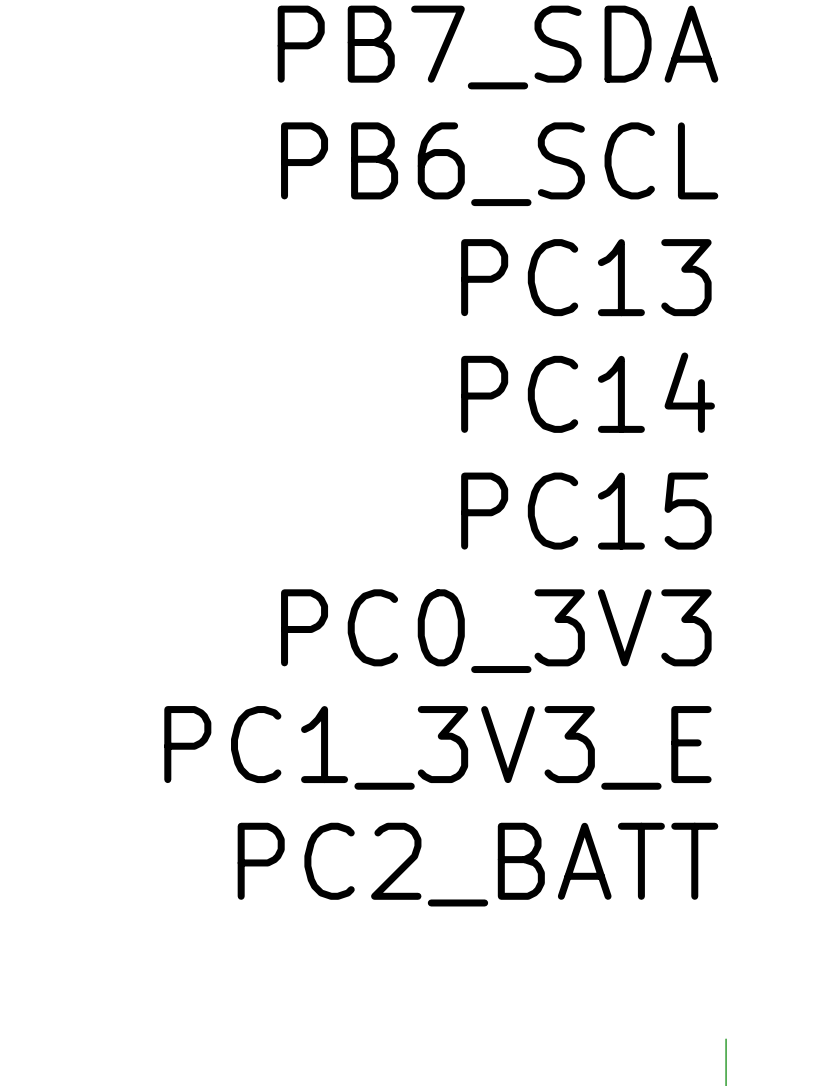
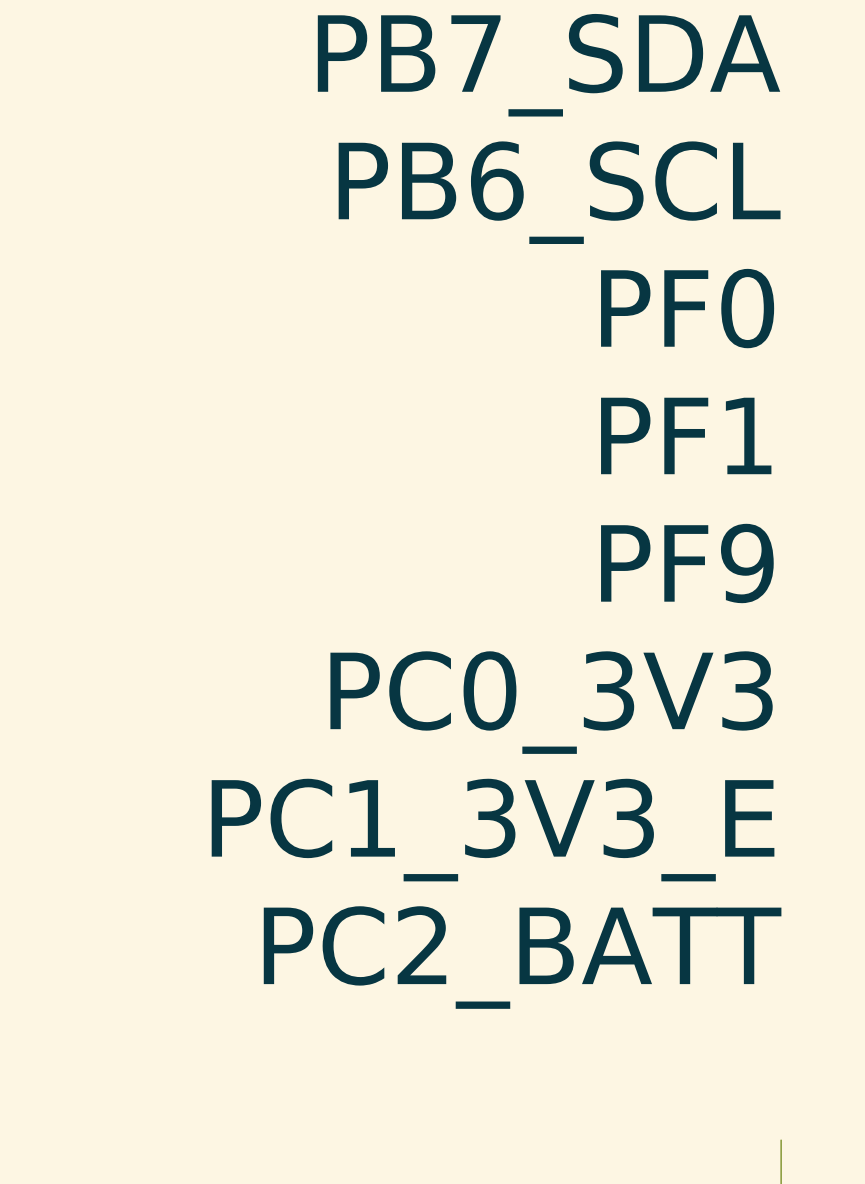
label: PC13 (586, 277) -> PF0 (687, 308)
label: PC14 (588, 392) -> PF1 (686, 435)
label: PC15 (586, 511) -> PF9 (687, 563)

